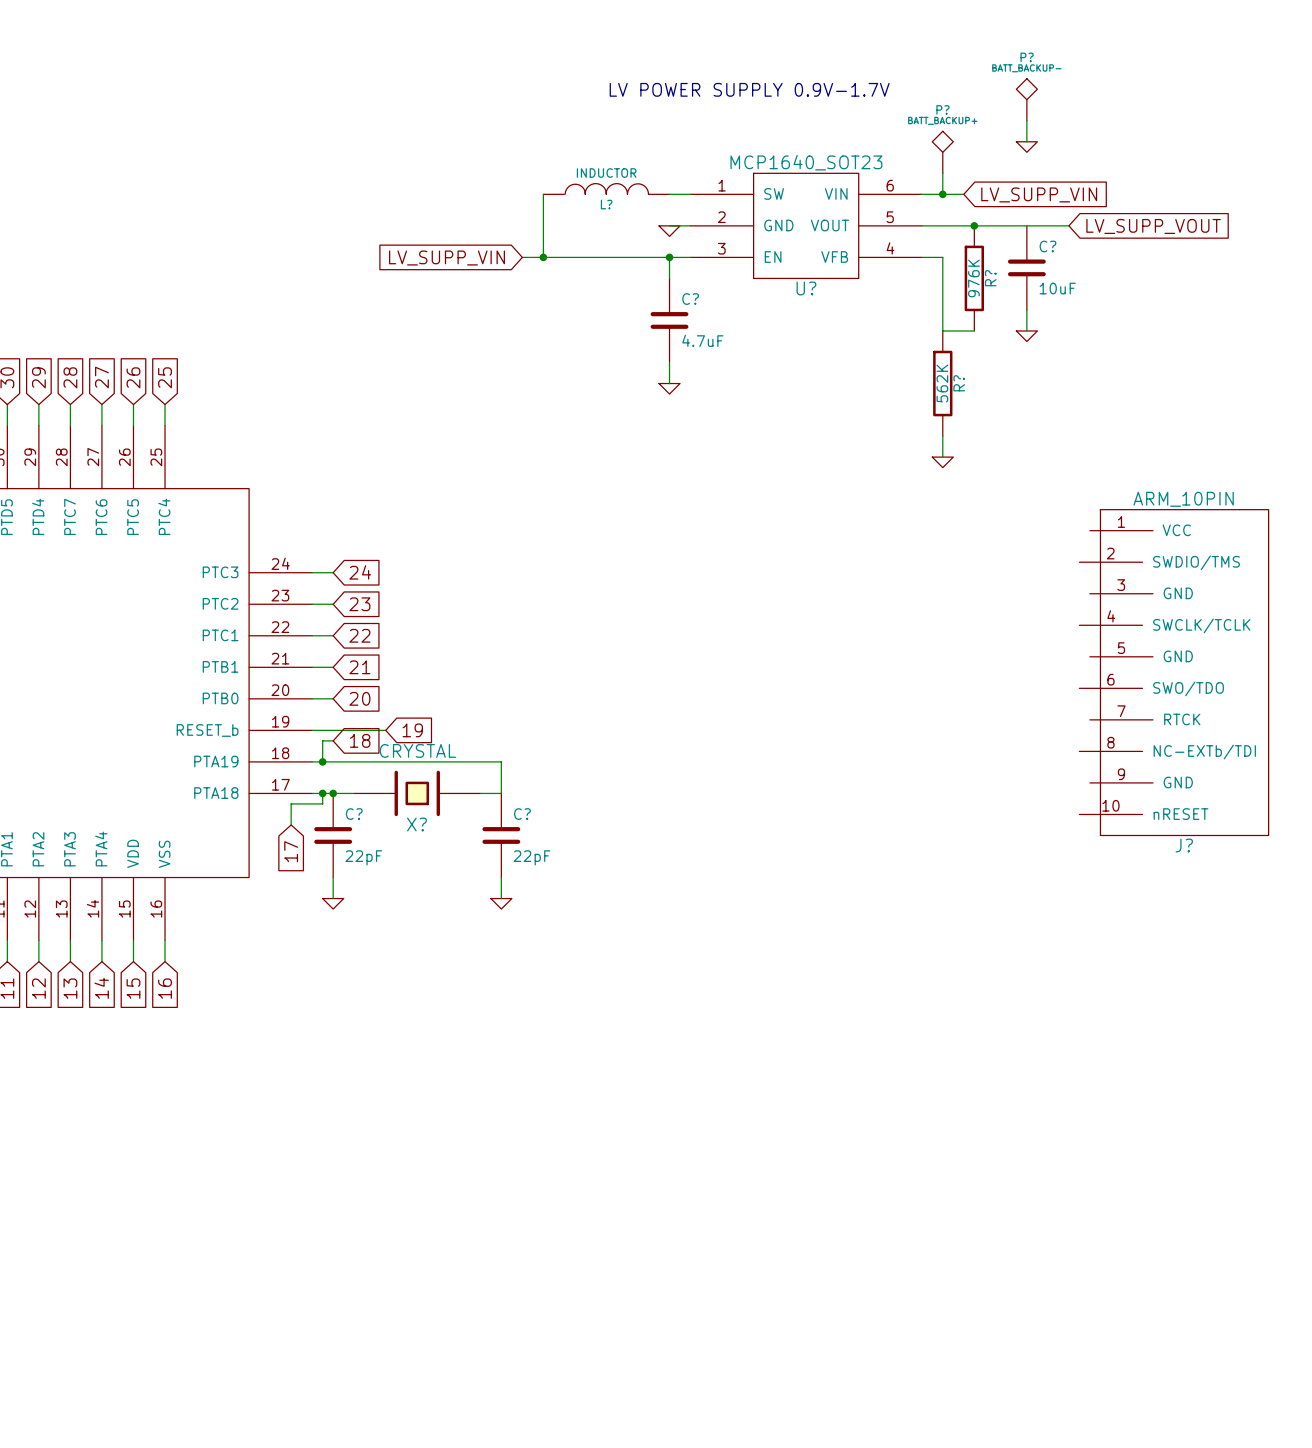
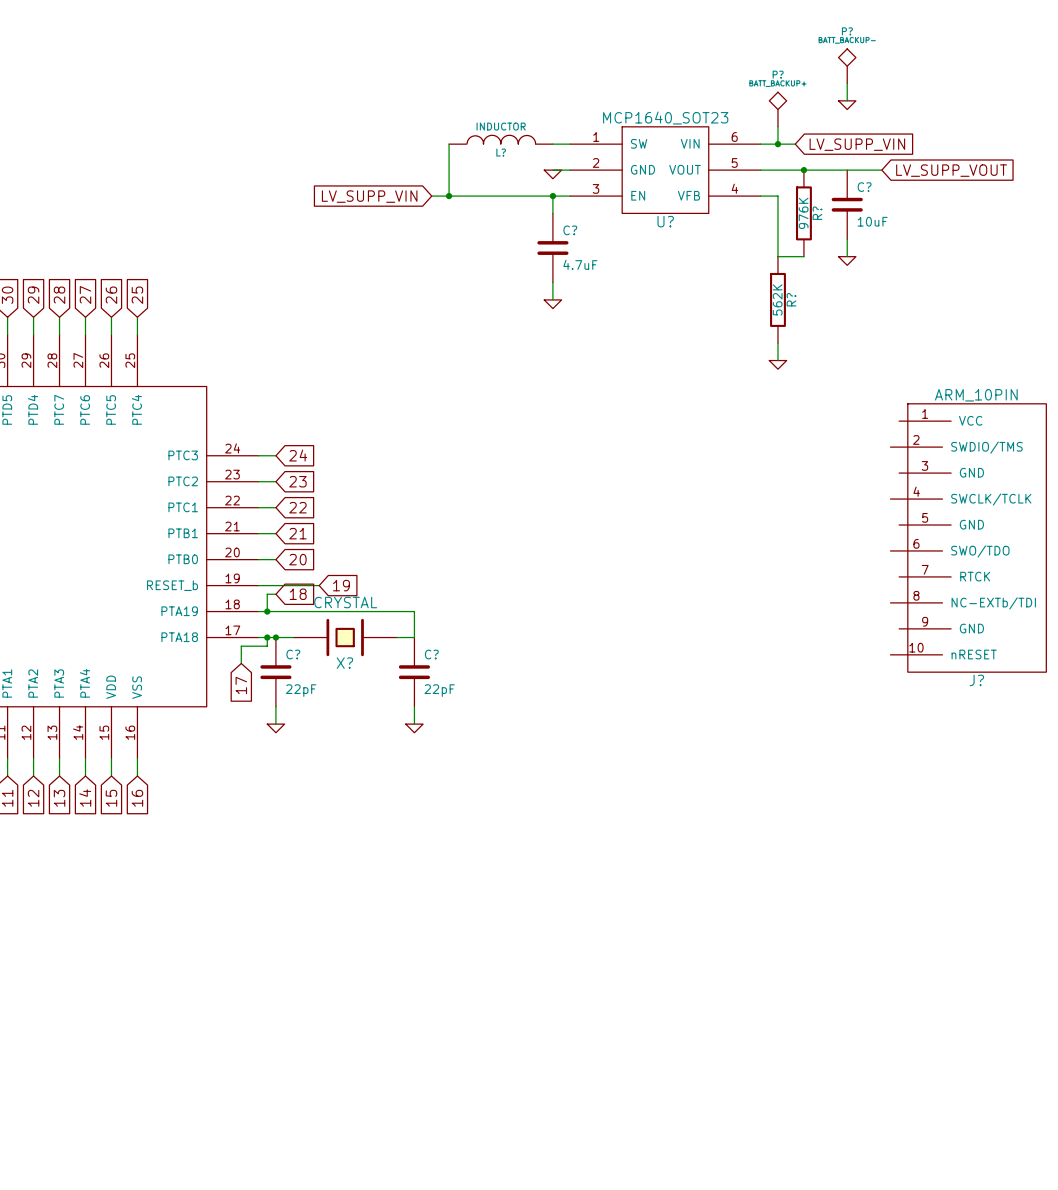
text: LV POWER SUPPLY 0.9V-1.7V (749, 89) -> none

